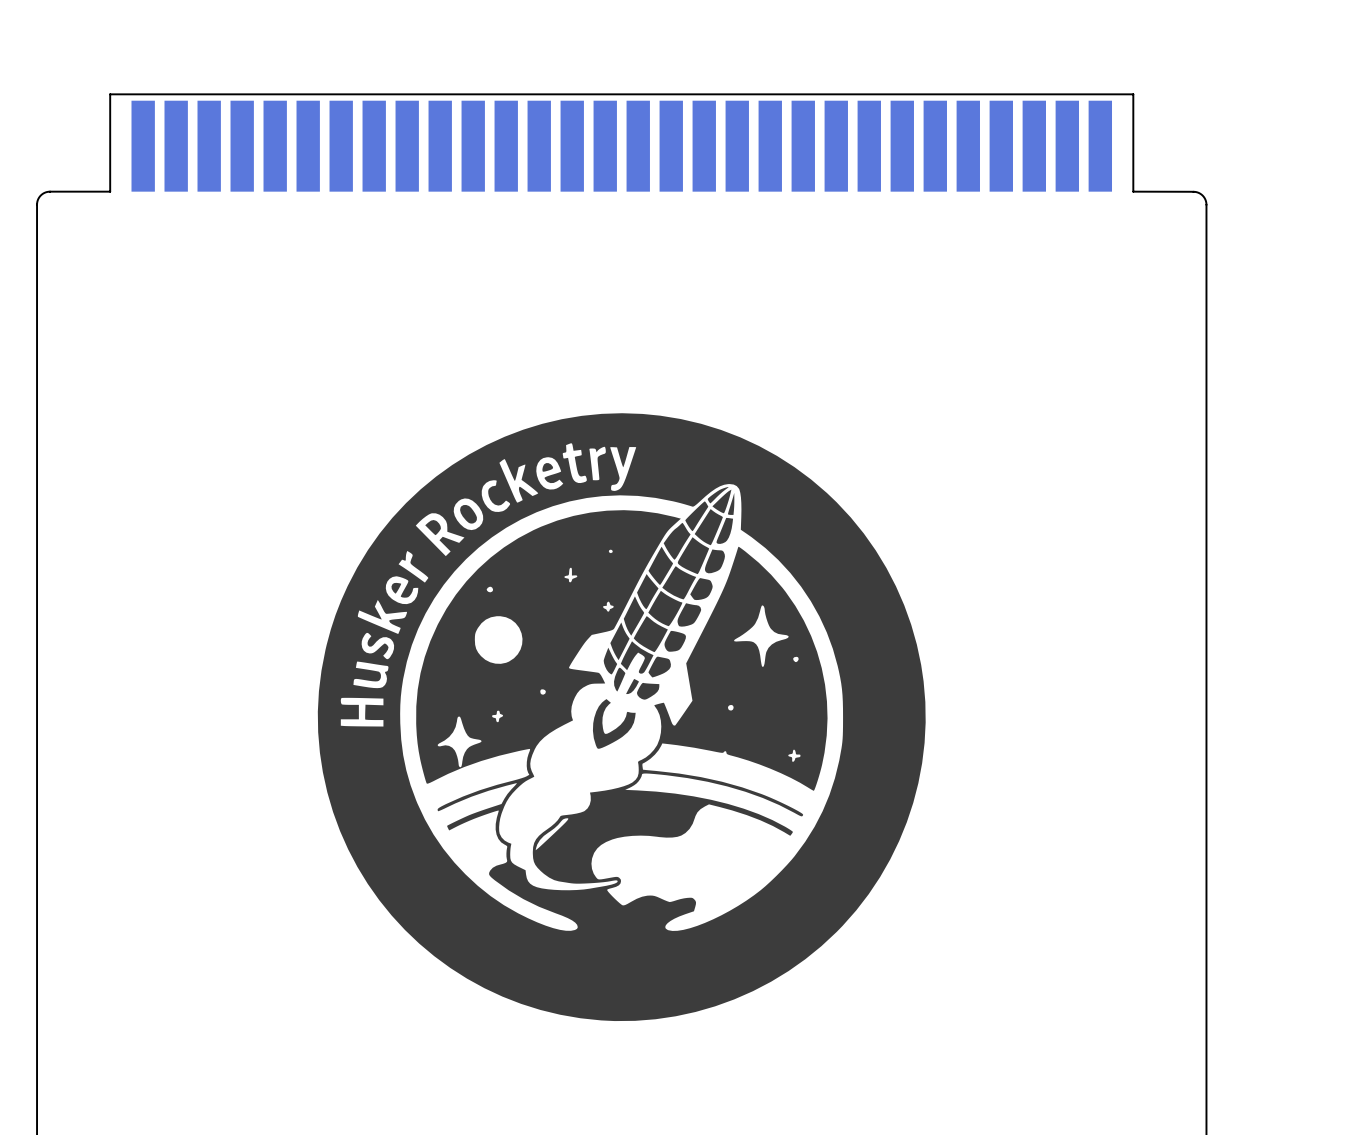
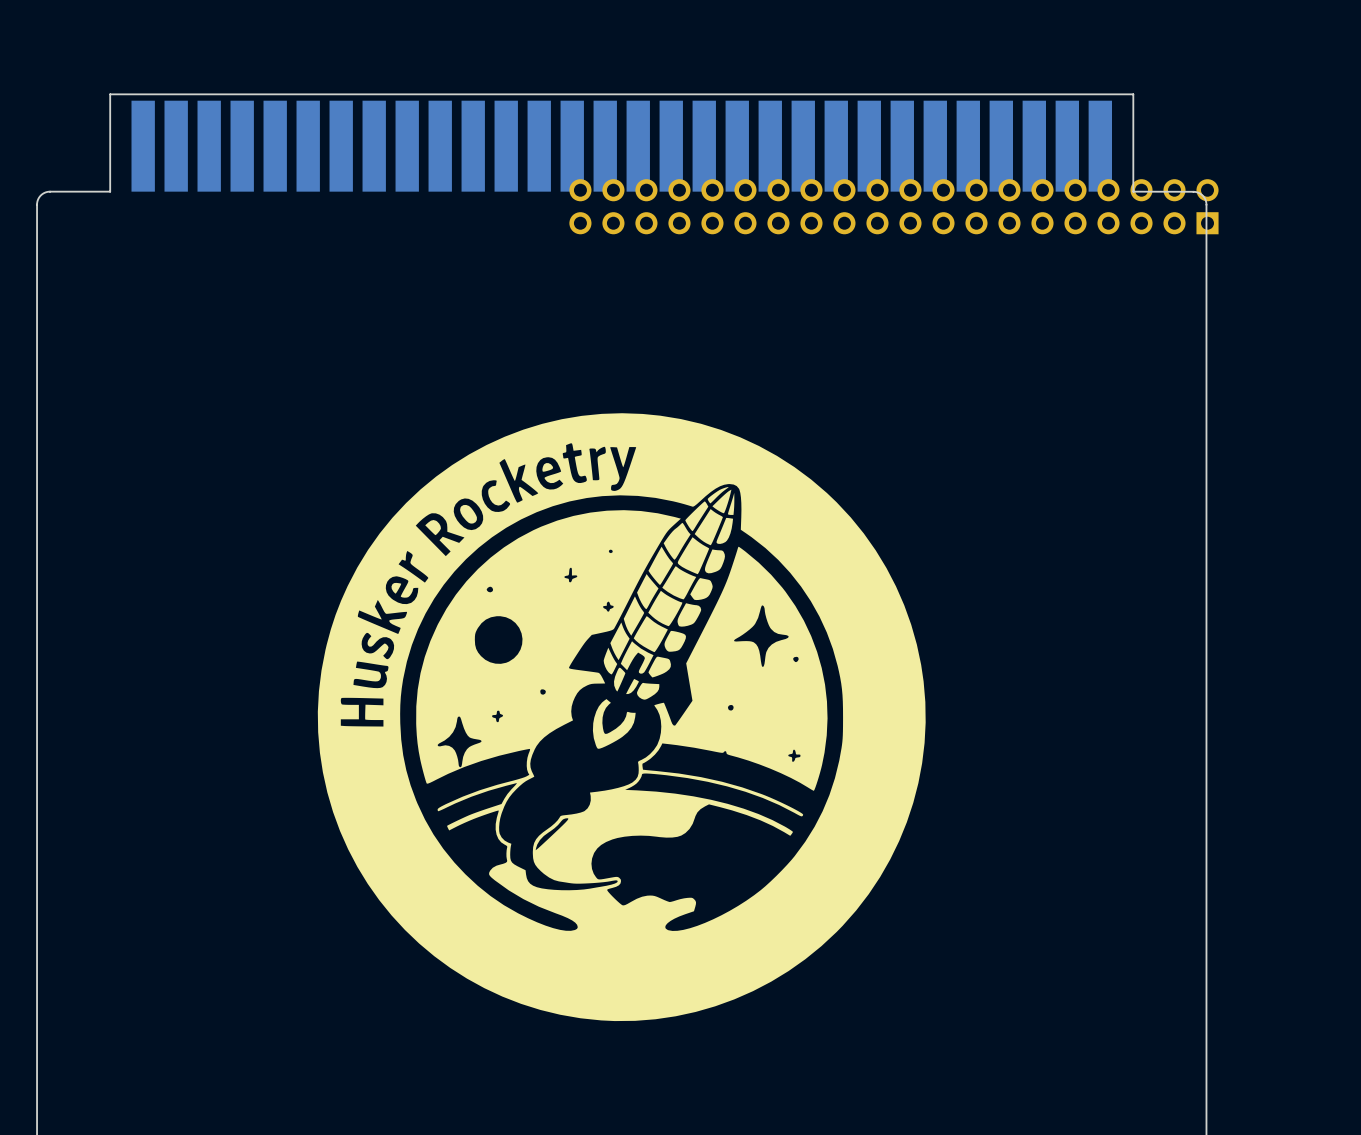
part: none -> (893, 206)

